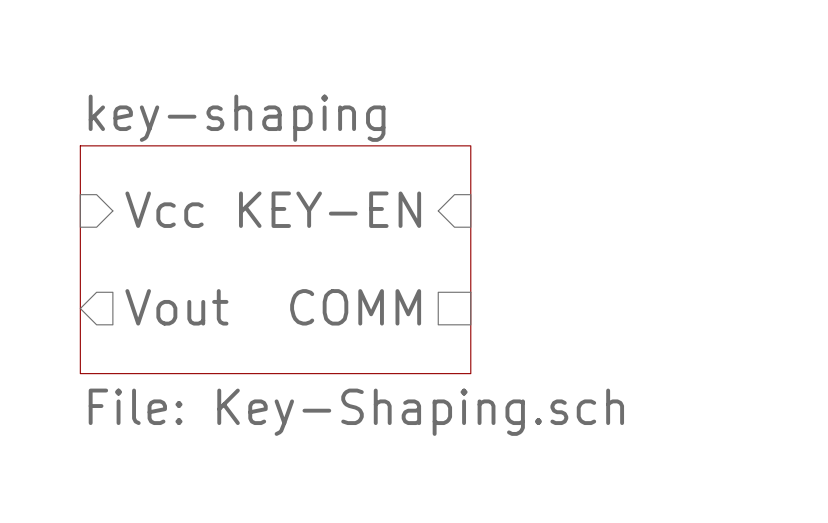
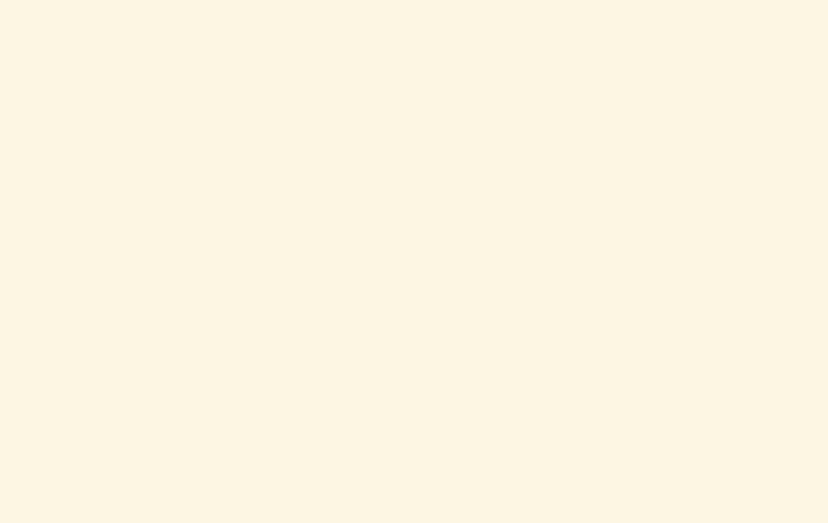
sheet pin: Vcc (164, 209) -> none
sheet pin: KEY-EN (330, 209) -> none
sheet key-shaping: File: Key-Shaping.sch (275, 259) -> none
sheet pin: Vout (176, 307) -> none
sheet pin: COMM (355, 307) -> none

